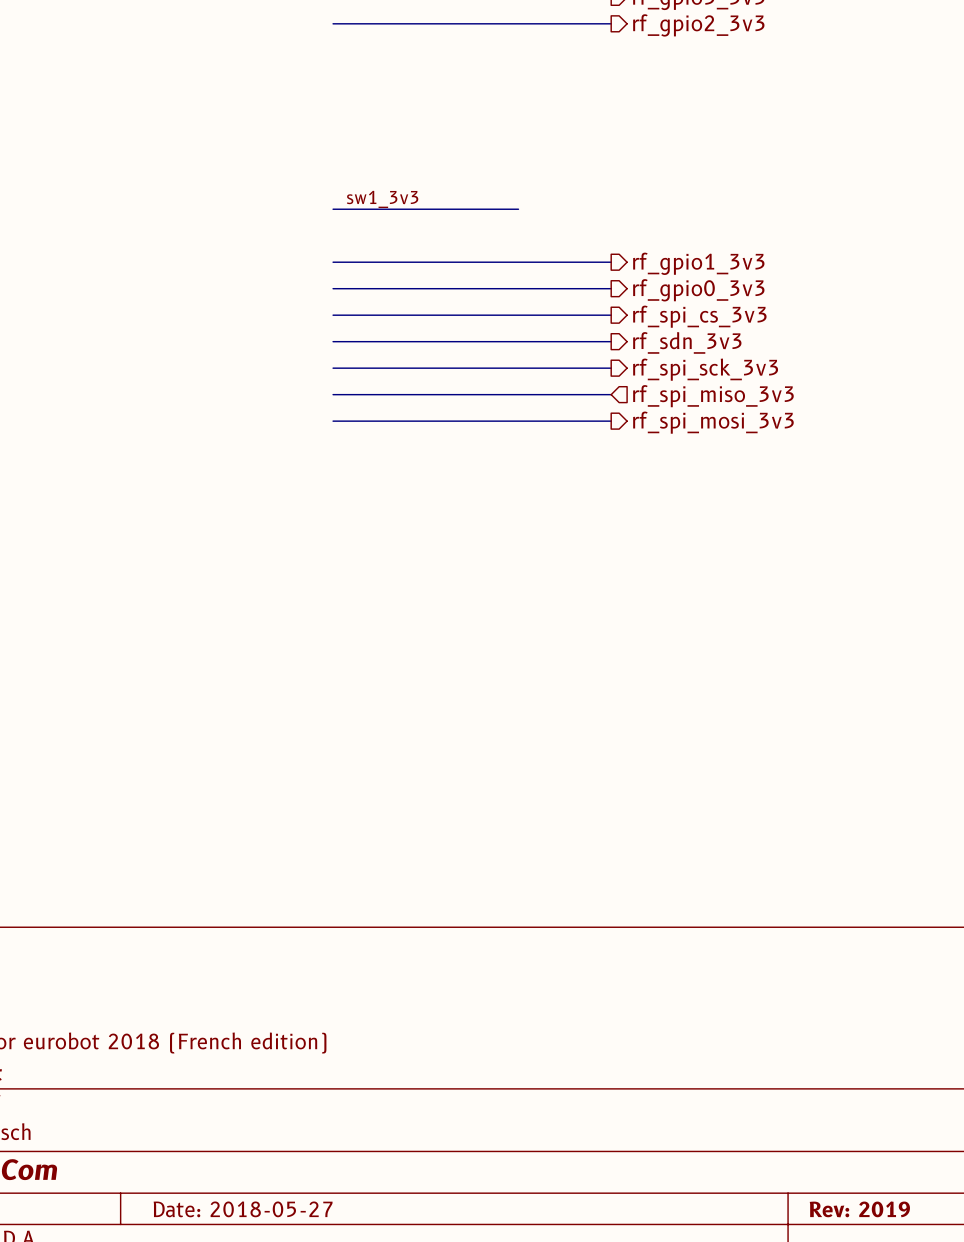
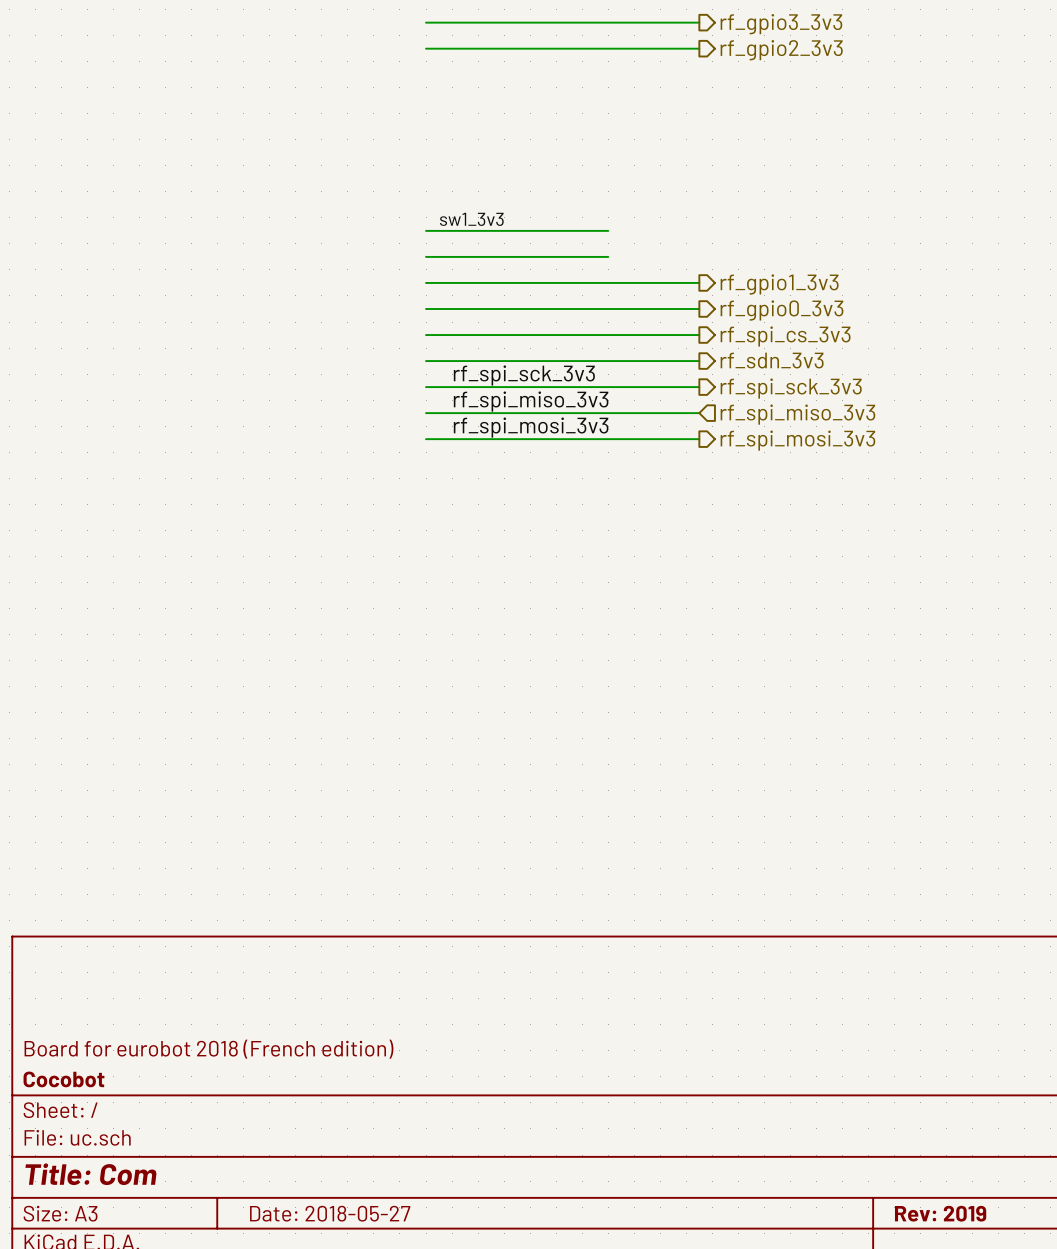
wire: none -> (426, 256) (608, 256)
label: none -> rf_spi_sck_3v3 (524, 375)
label: none -> rf_spi_miso_3v3 (531, 401)
label: none -> rf_spi_mosi_3v3 (531, 427)

